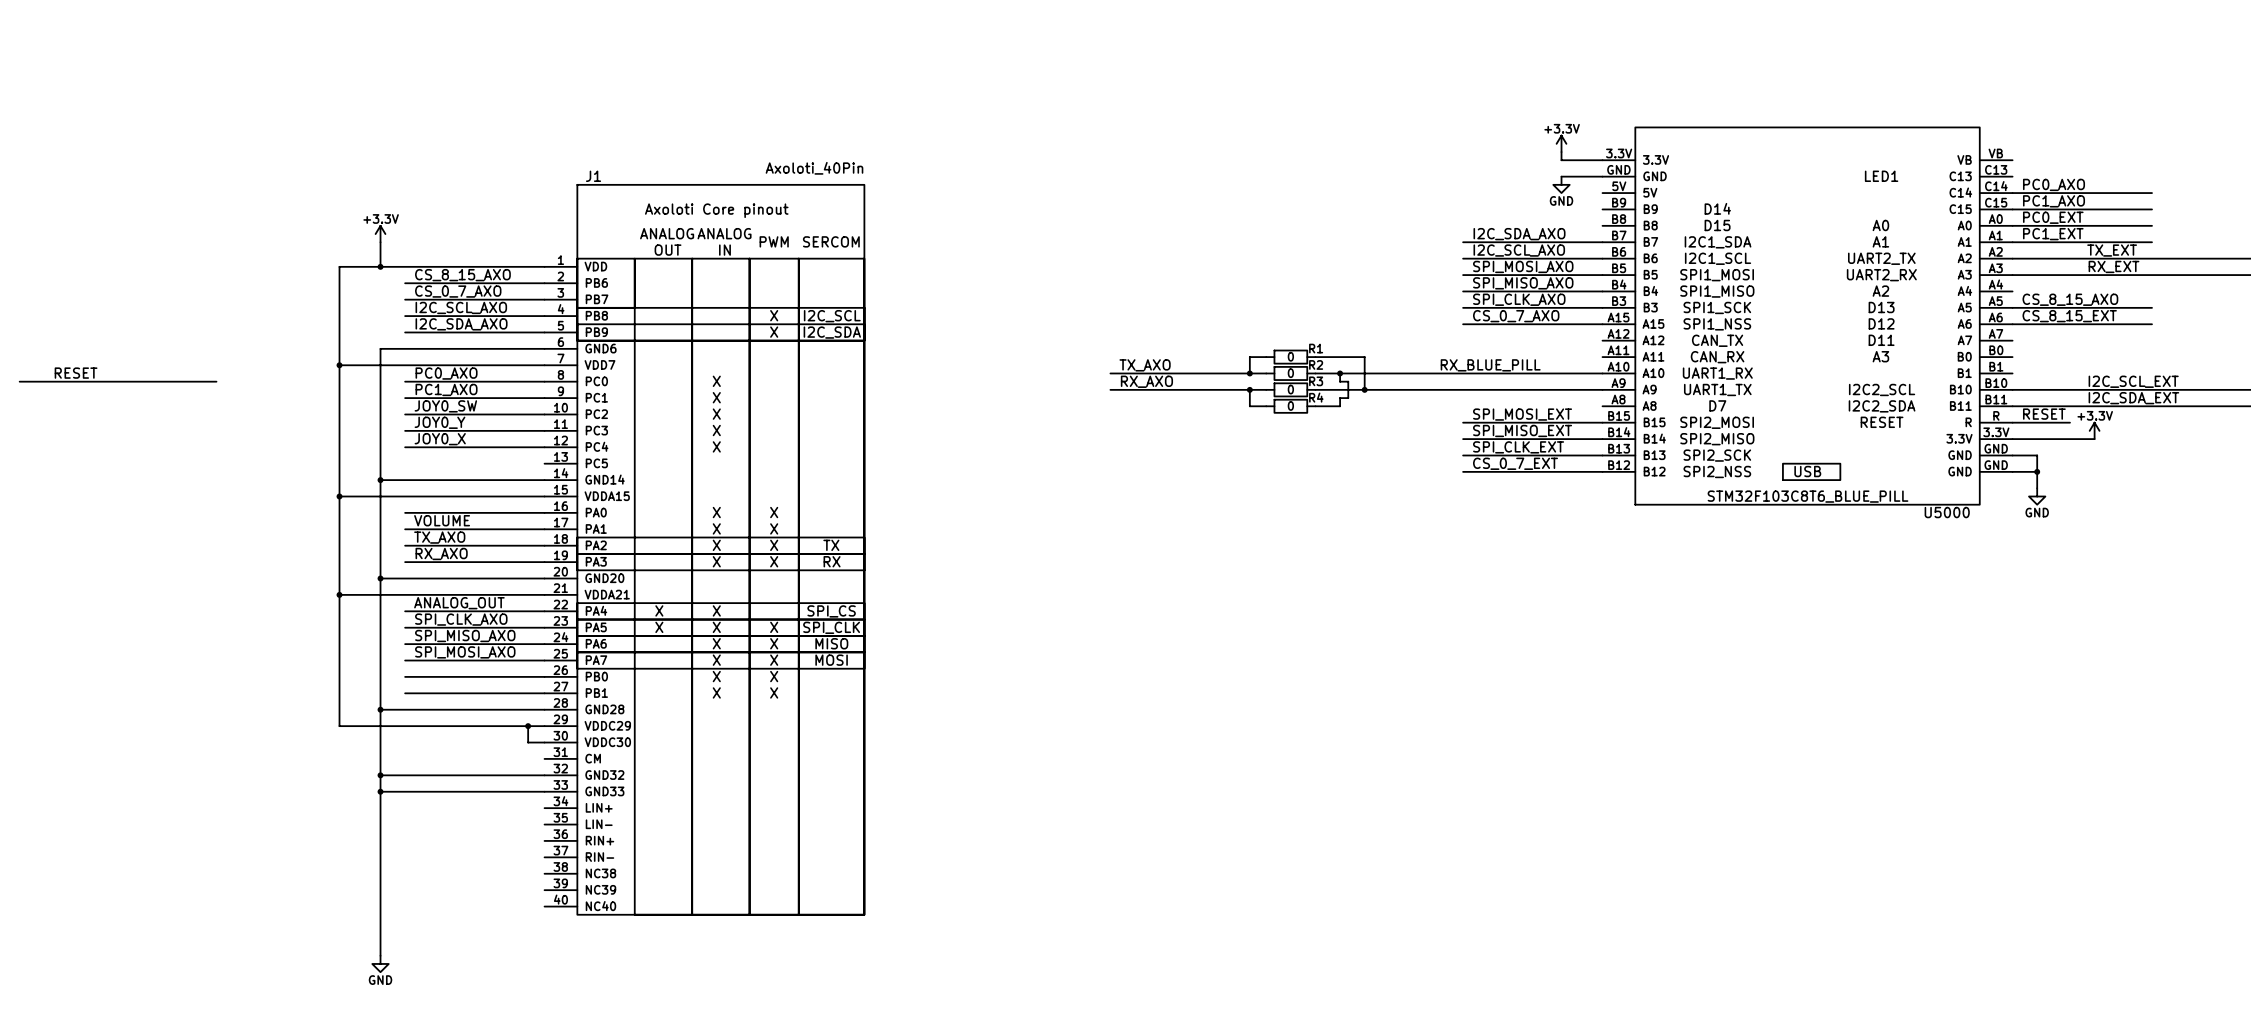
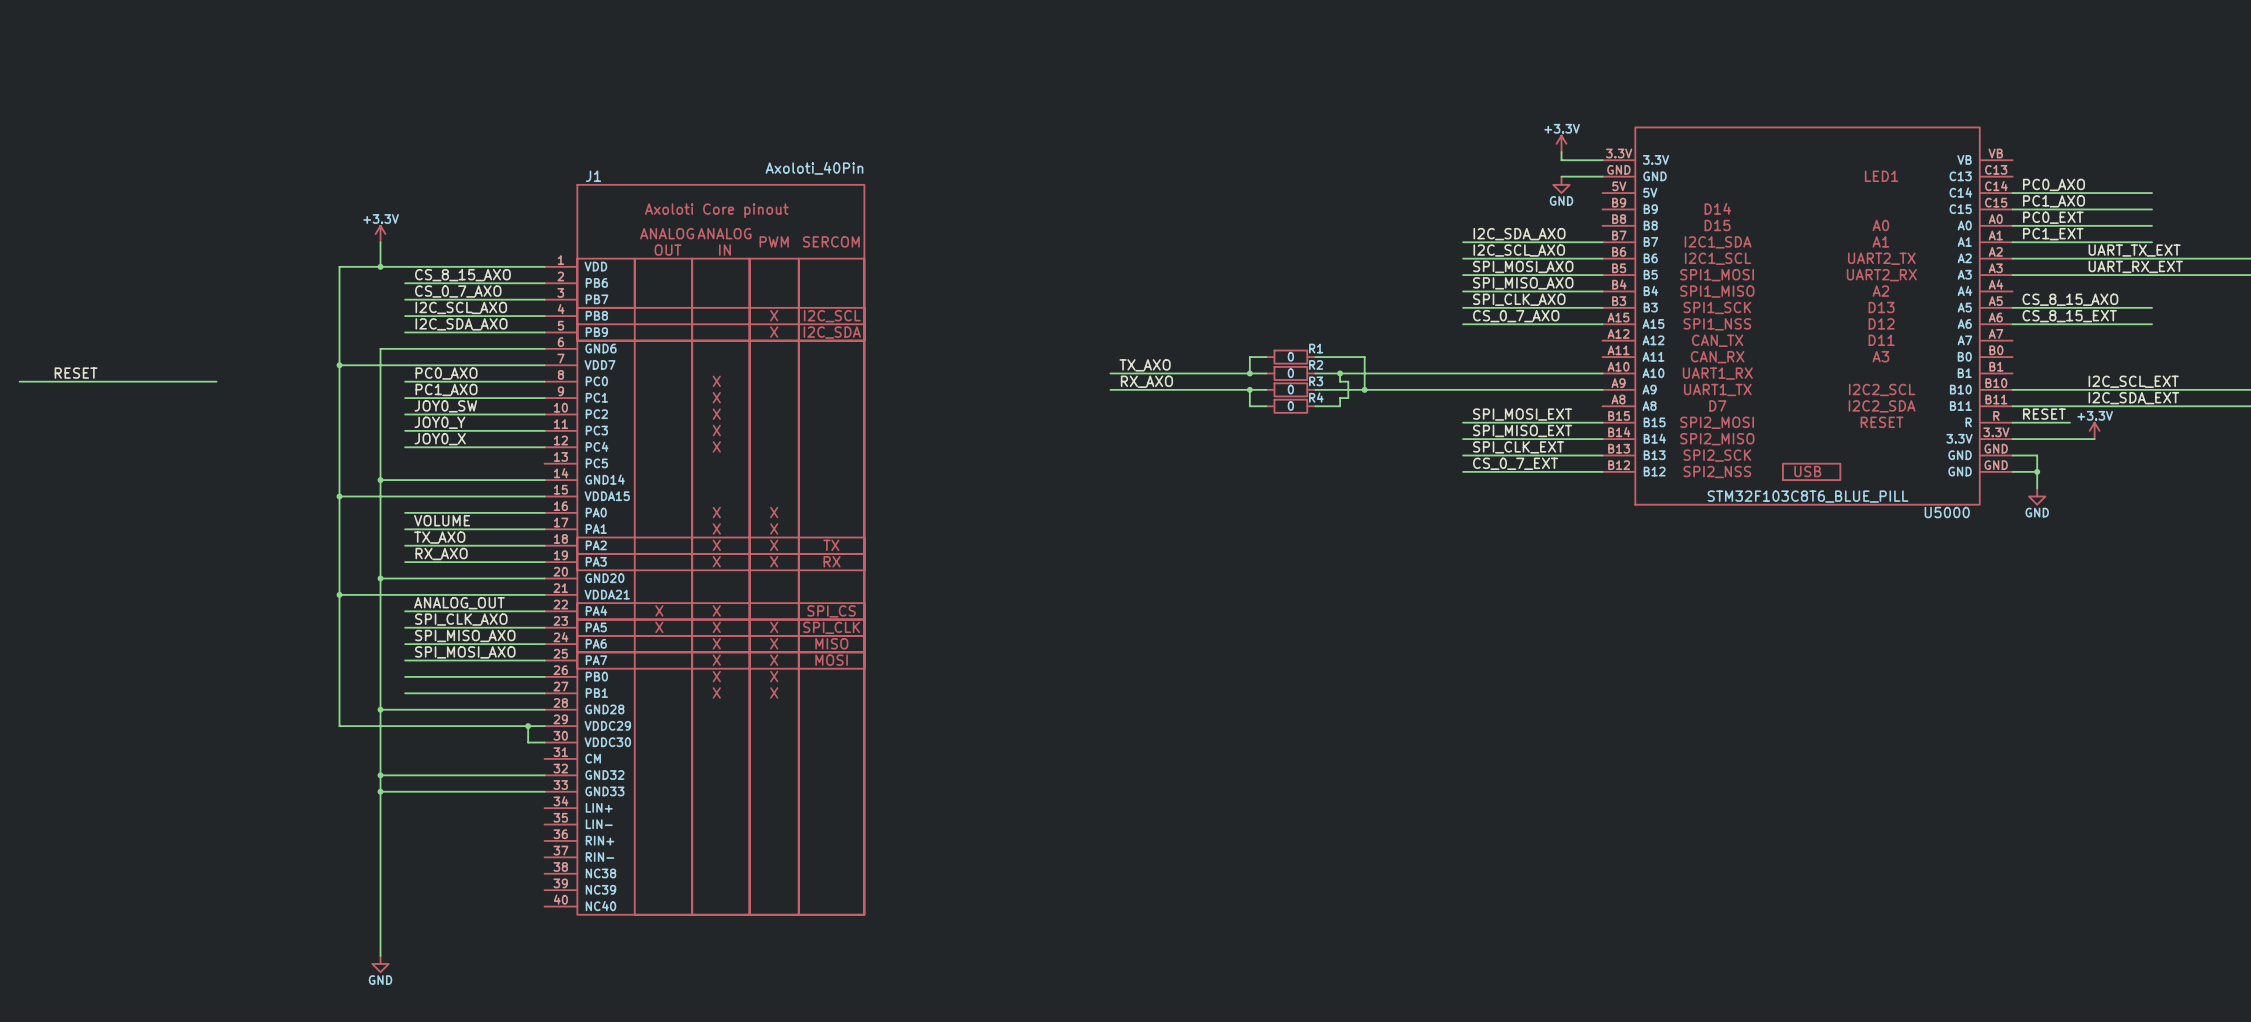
label: TX_EXT (2112, 250) -> UART_TX_EXT (2134, 250)
label: RX_EXT (2113, 266) -> UART_RX_EXT (2135, 266)
label: RX_BLUE_PILL (1490, 365) -> none

